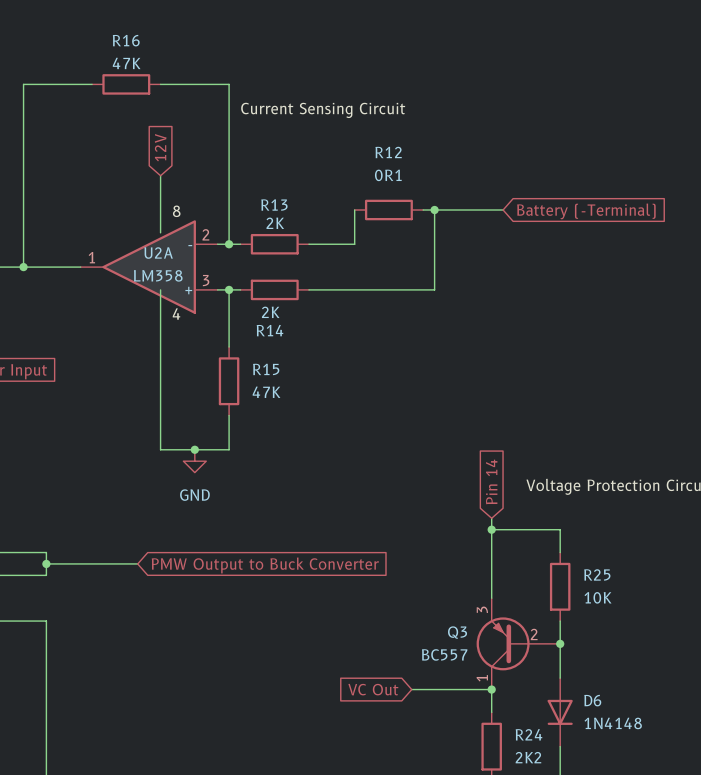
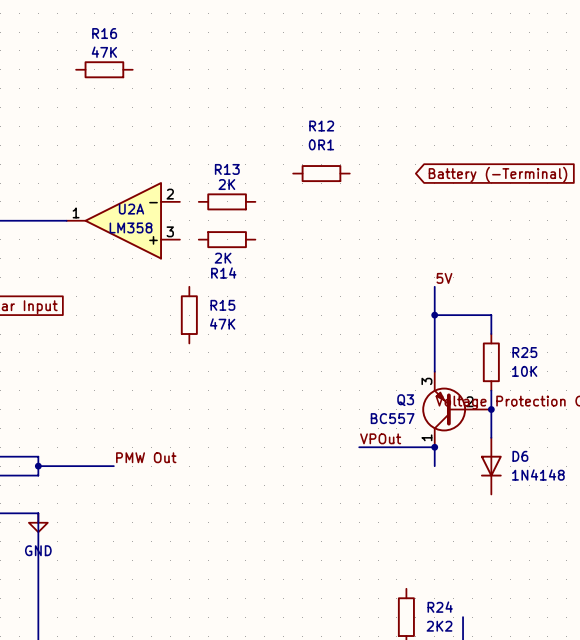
wire: (92, 84) (23, 84) (23, 267) -> none
wire: (160, 84) (229, 84) (229, 244) -> none
label: Current Sensing Circuit (323, 110) -> none
global label: 12V (160, 147) -> none
wire: (160, 175) (160, 232) -> none
wire: (354, 209) (354, 244) (309, 244) -> none
wire: (423, 209) (503, 209) -> none
wire: (434, 209) (434, 289) (309, 289) -> none
junction: (434, 209) -> none
label: 8 (176, 211) -> none
wire: (217, 244) (240, 244) -> none
junction: (229, 244) -> none
junction: (23, 267) -> none
wire: (160, 289) (160, 449) (229, 449) (229, 415) -> none
wire: (217, 289) (240, 289) -> none
wire: (229, 289) (229, 347) -> none
junction: (229, 289) -> none
label: 4 (176, 313) -> none
label: none -> 5V (444, 278)
wire: none -> (434, 286) (434, 371)
junction: none -> (434, 315)
junction: (194, 449) -> none
power symbol: GND (194, 461) -> none
global label: Pin 14 (491, 481) -> none
junction: none -> (491, 409)
wire: (491, 518) (491, 598) -> none
wire: (491, 529) (560, 529) (560, 552) -> (434, 315) (491, 315) (491, 334)
junction position: (491, 529) -> (434, 447)
label: none -> VPOut (380, 438)
wire: none -> (359, 447) (434, 447) (434, 466)
label: none -> PMW Out (146, 457)
global label: PMW Output to Buck Converter (265, 565) -> none
R25 position: (560, 586) -> (491, 362)
wire: (560, 621) (560, 678) -> (491, 390) (491, 437)
power symbol: none -> GND (38, 522)
Q3 position: (518, 643) -> (456, 409)
junction: (560, 643) -> none
global label: VC Out (373, 689) -> none
wire: (411, 689) (491, 689) (491, 712) -> none
junction: (491, 689) -> none
D6 position: (560, 712) -> (491, 466)

